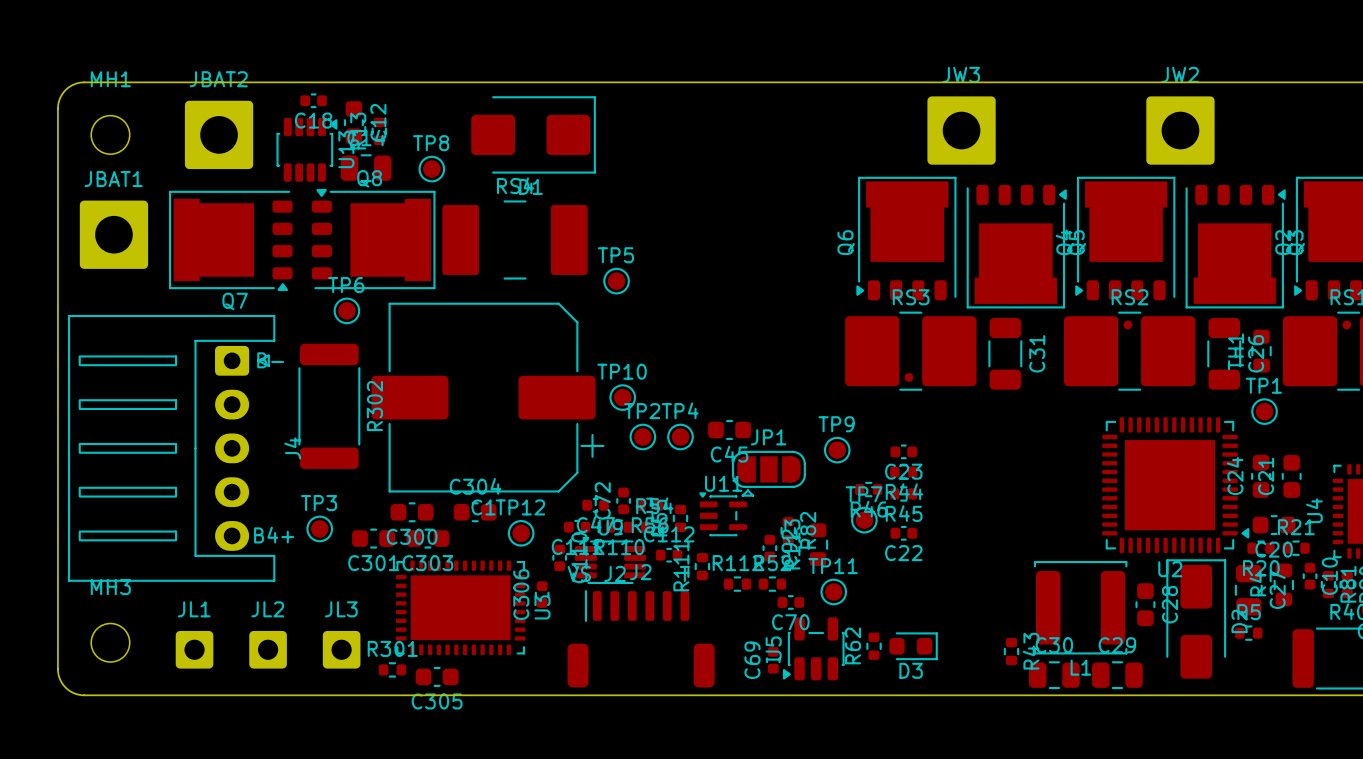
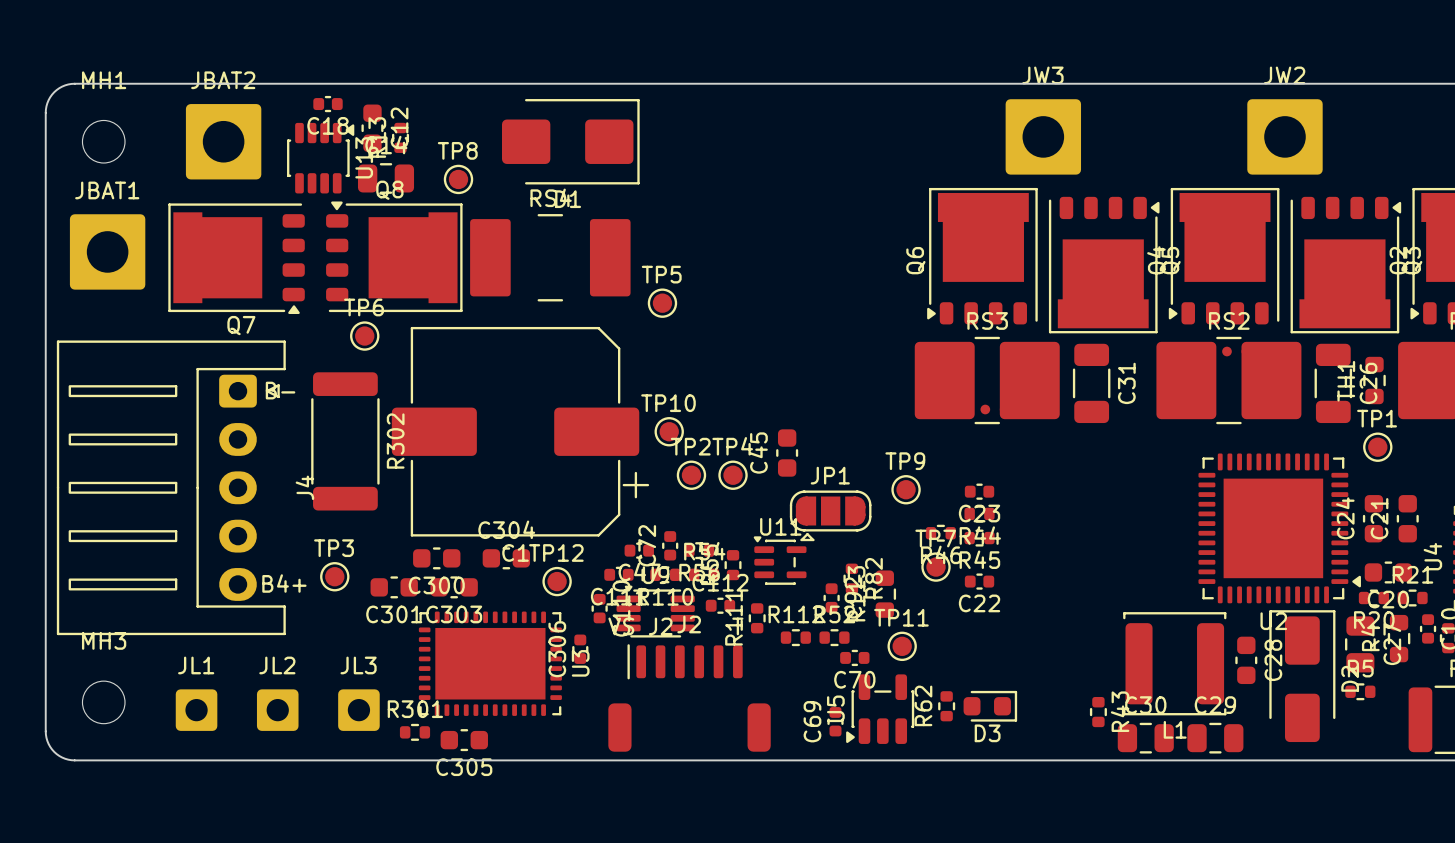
C45 rotation: 0° (729, 429) -> 90° clockwise (787, 453)

